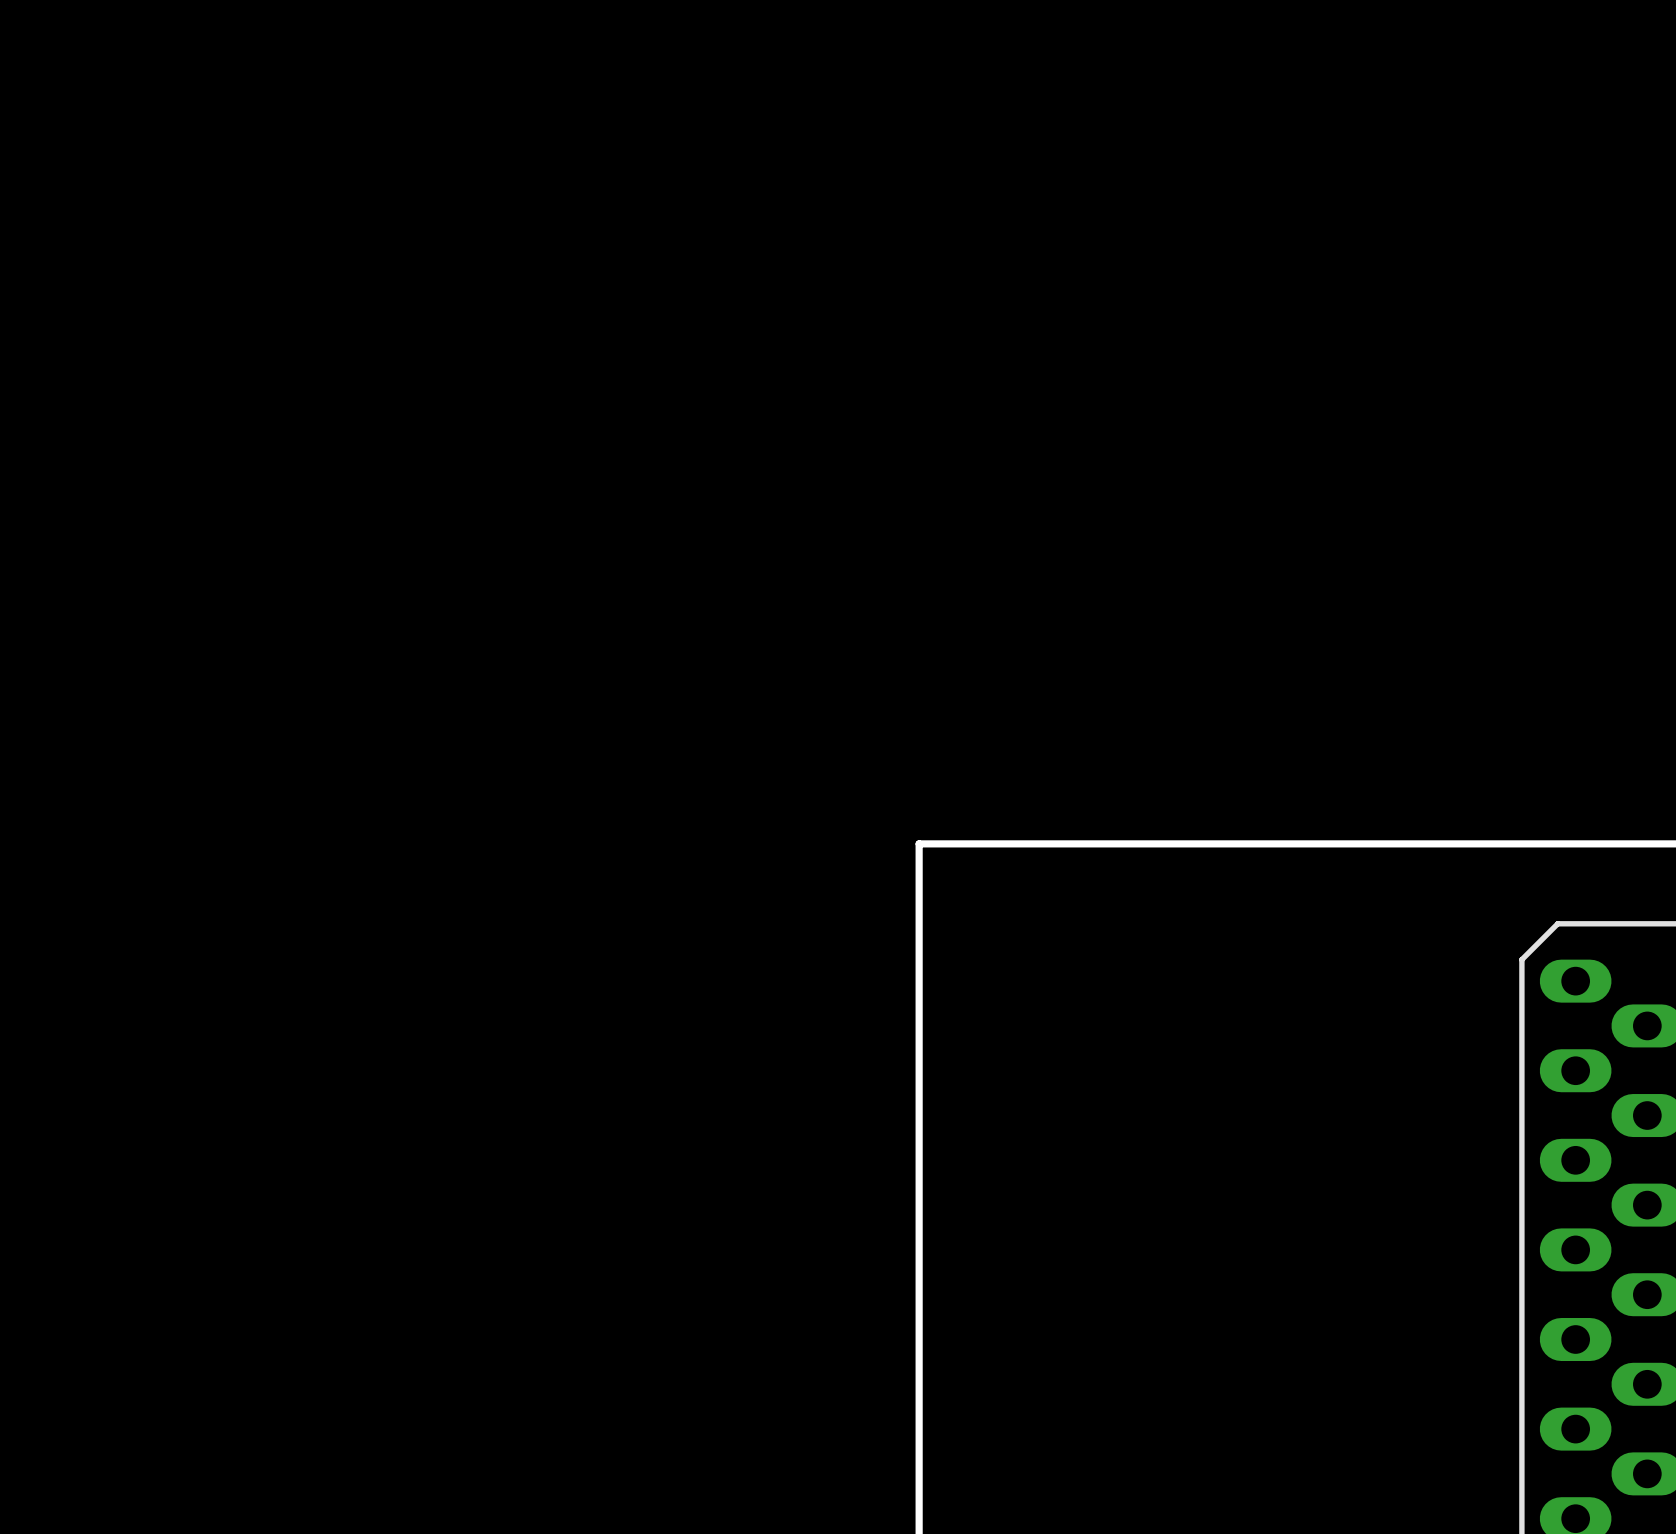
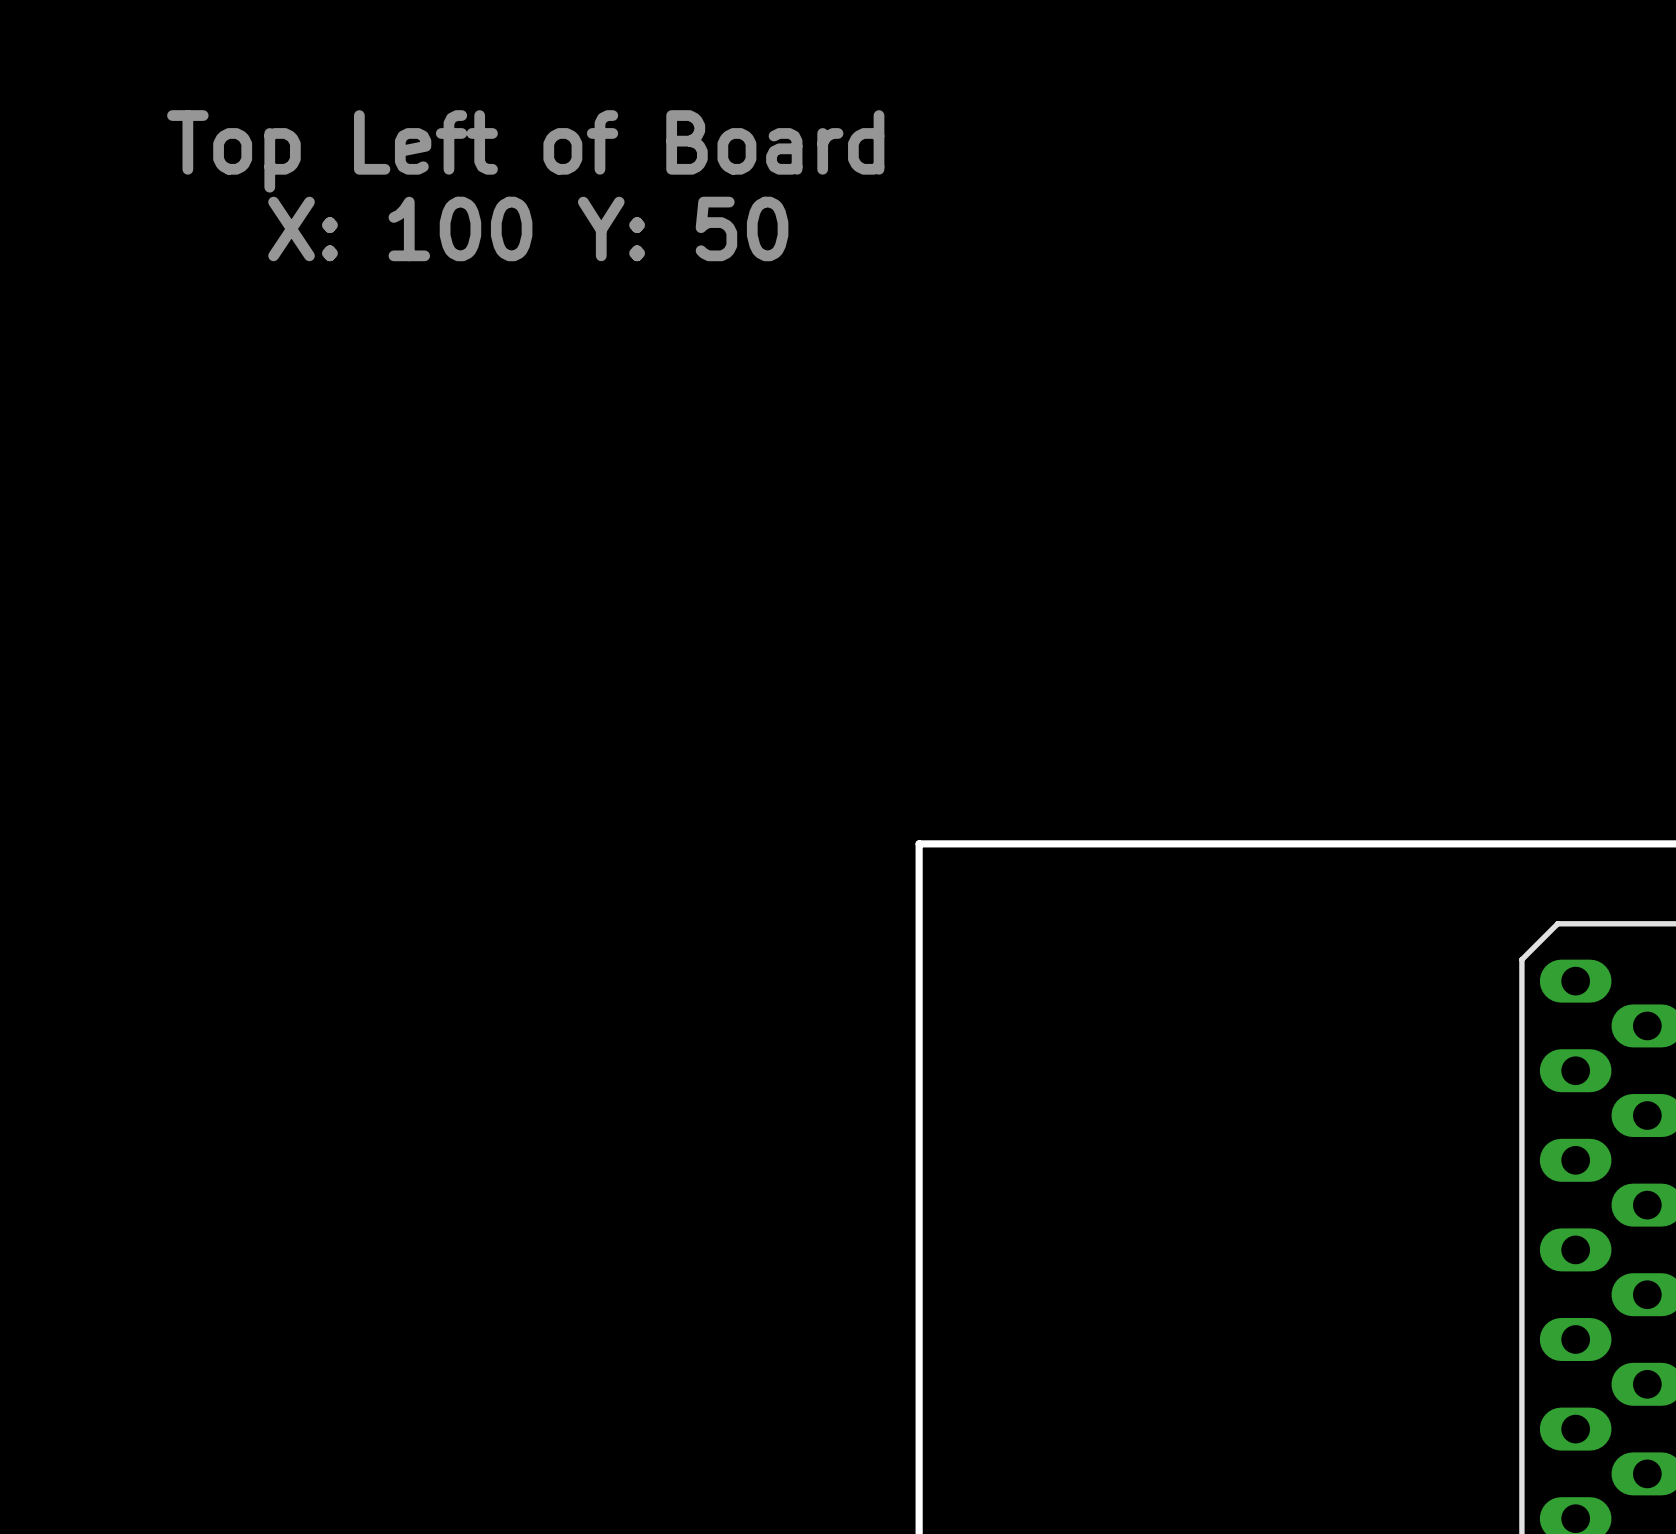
text: none -> Top Left of Board (525, 151)
text: none -> X: 100 Y: 50 (528, 228)

